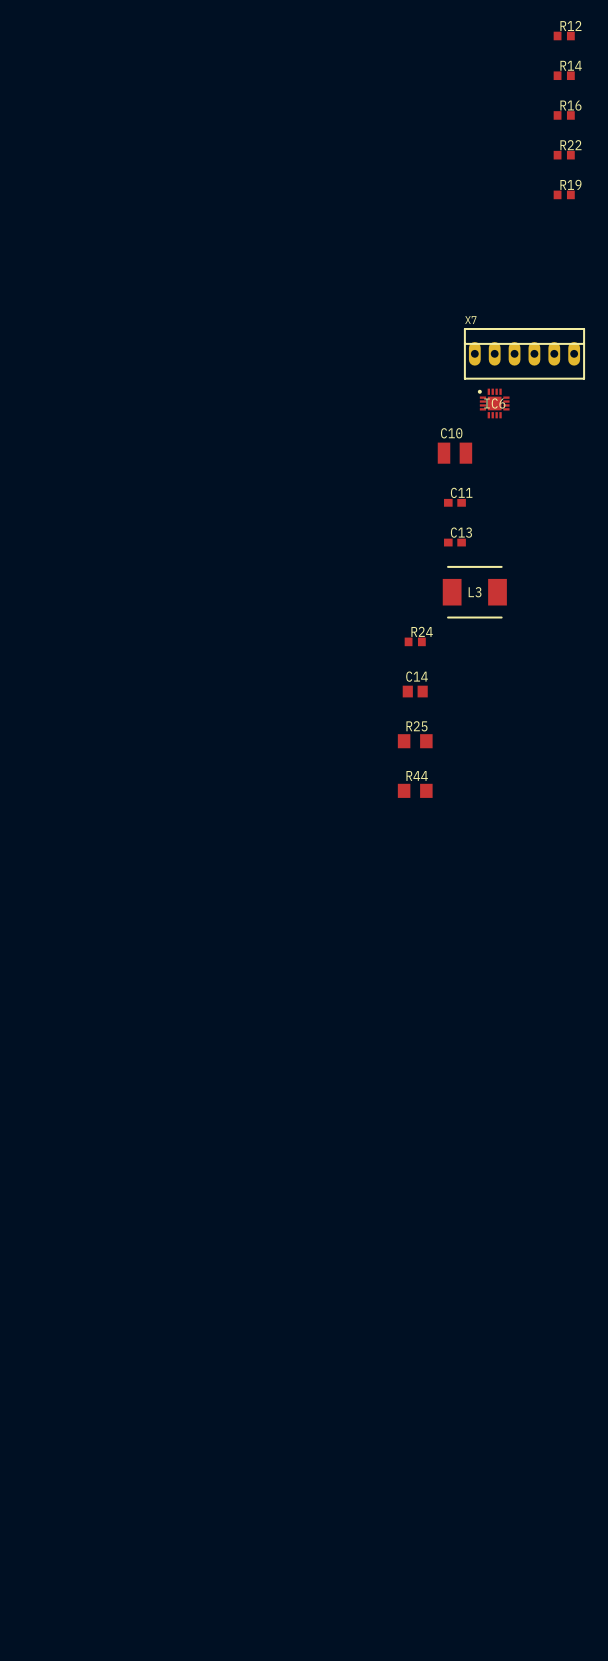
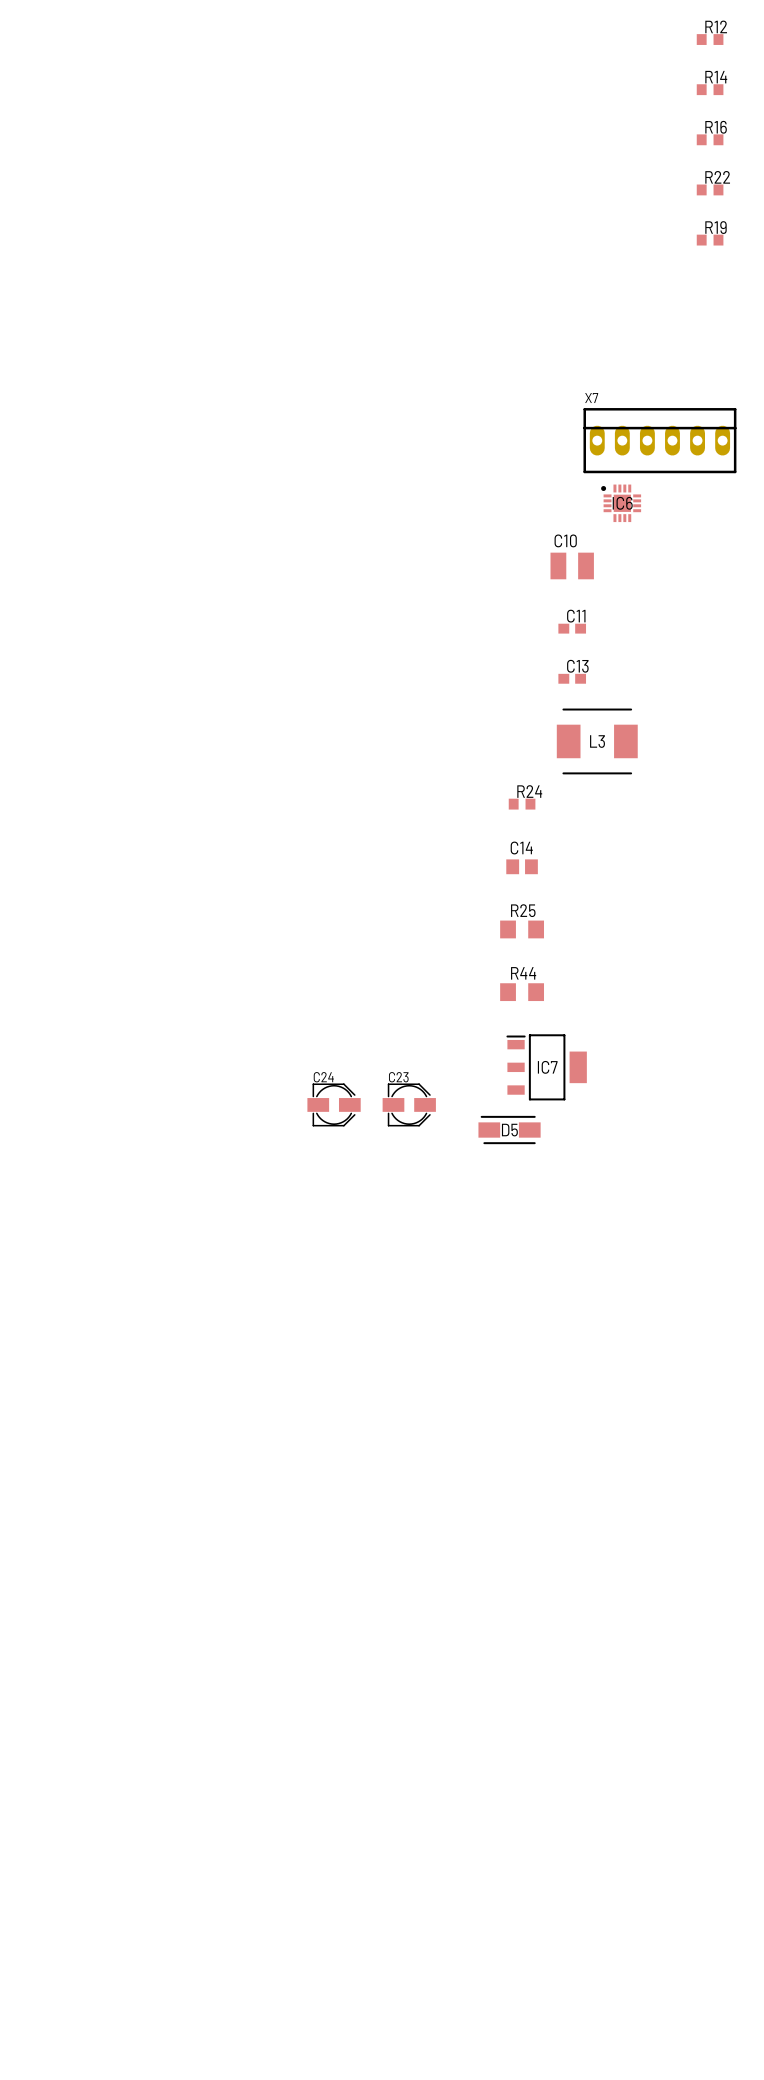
IC7: none -> (546, 1067)
C24: none -> (334, 1104)
C23: none -> (409, 1104)
D5: none -> (509, 1130)

